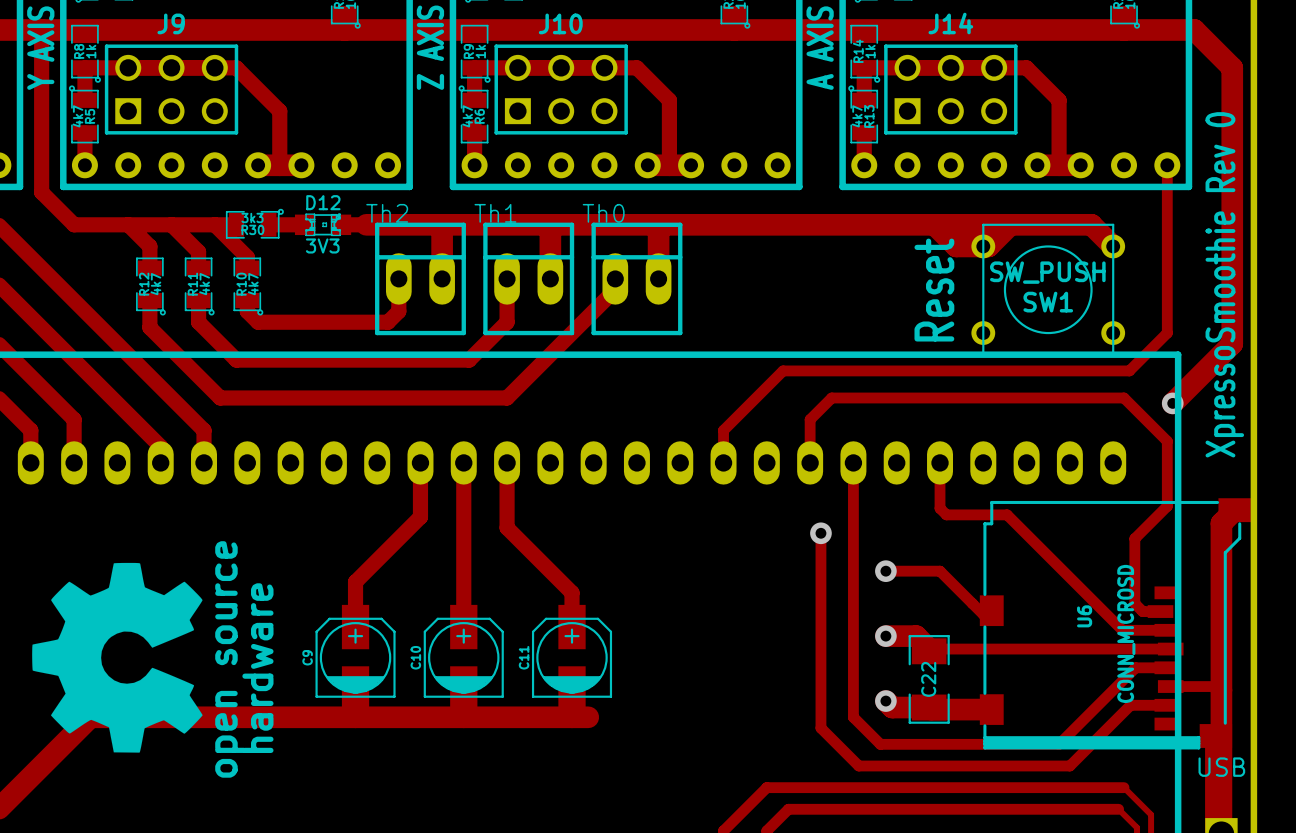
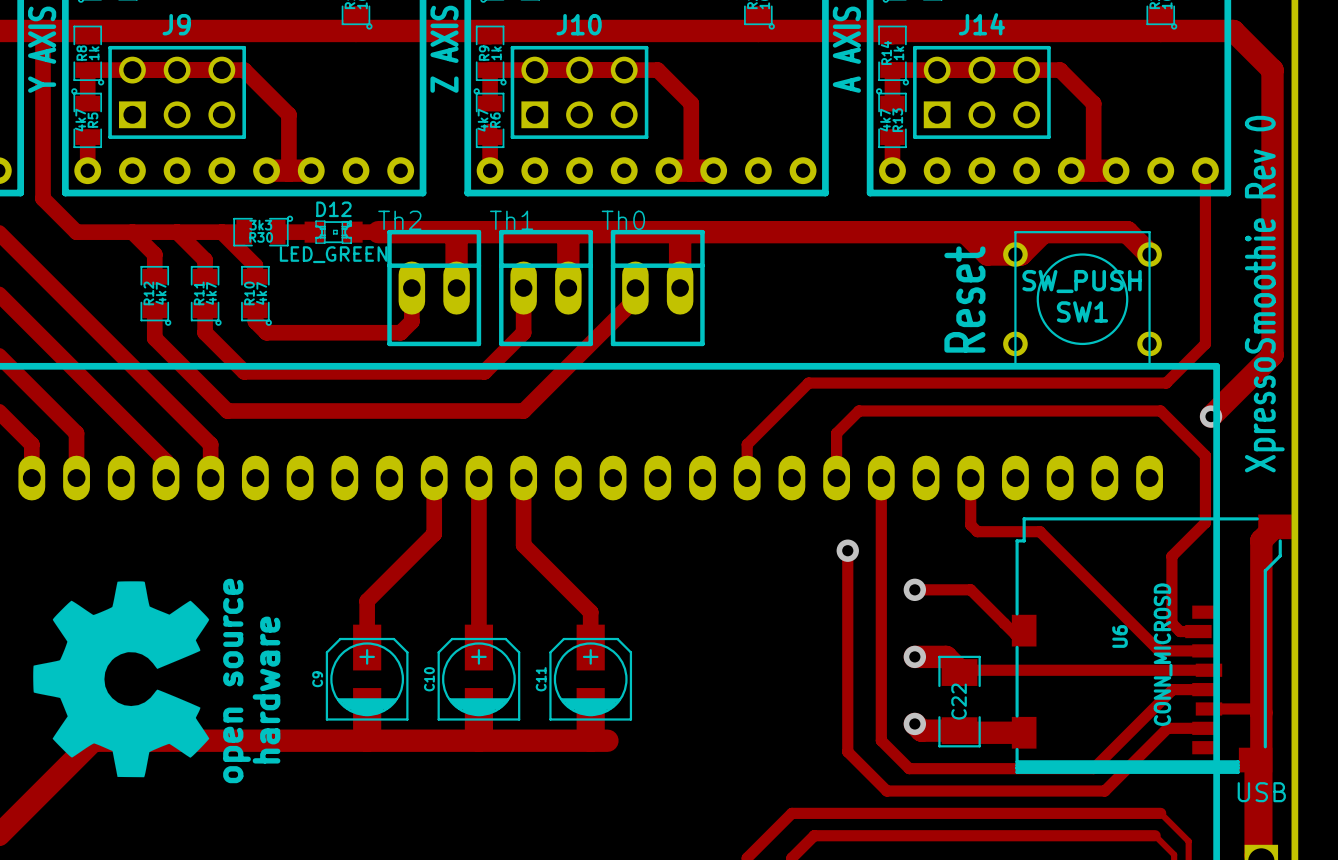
D12 value: 3V3 (322, 245) -> LED_GREEN (333, 254)
drawing shape: [32, 541, 274, 778] -> [33, 578, 281, 784]

